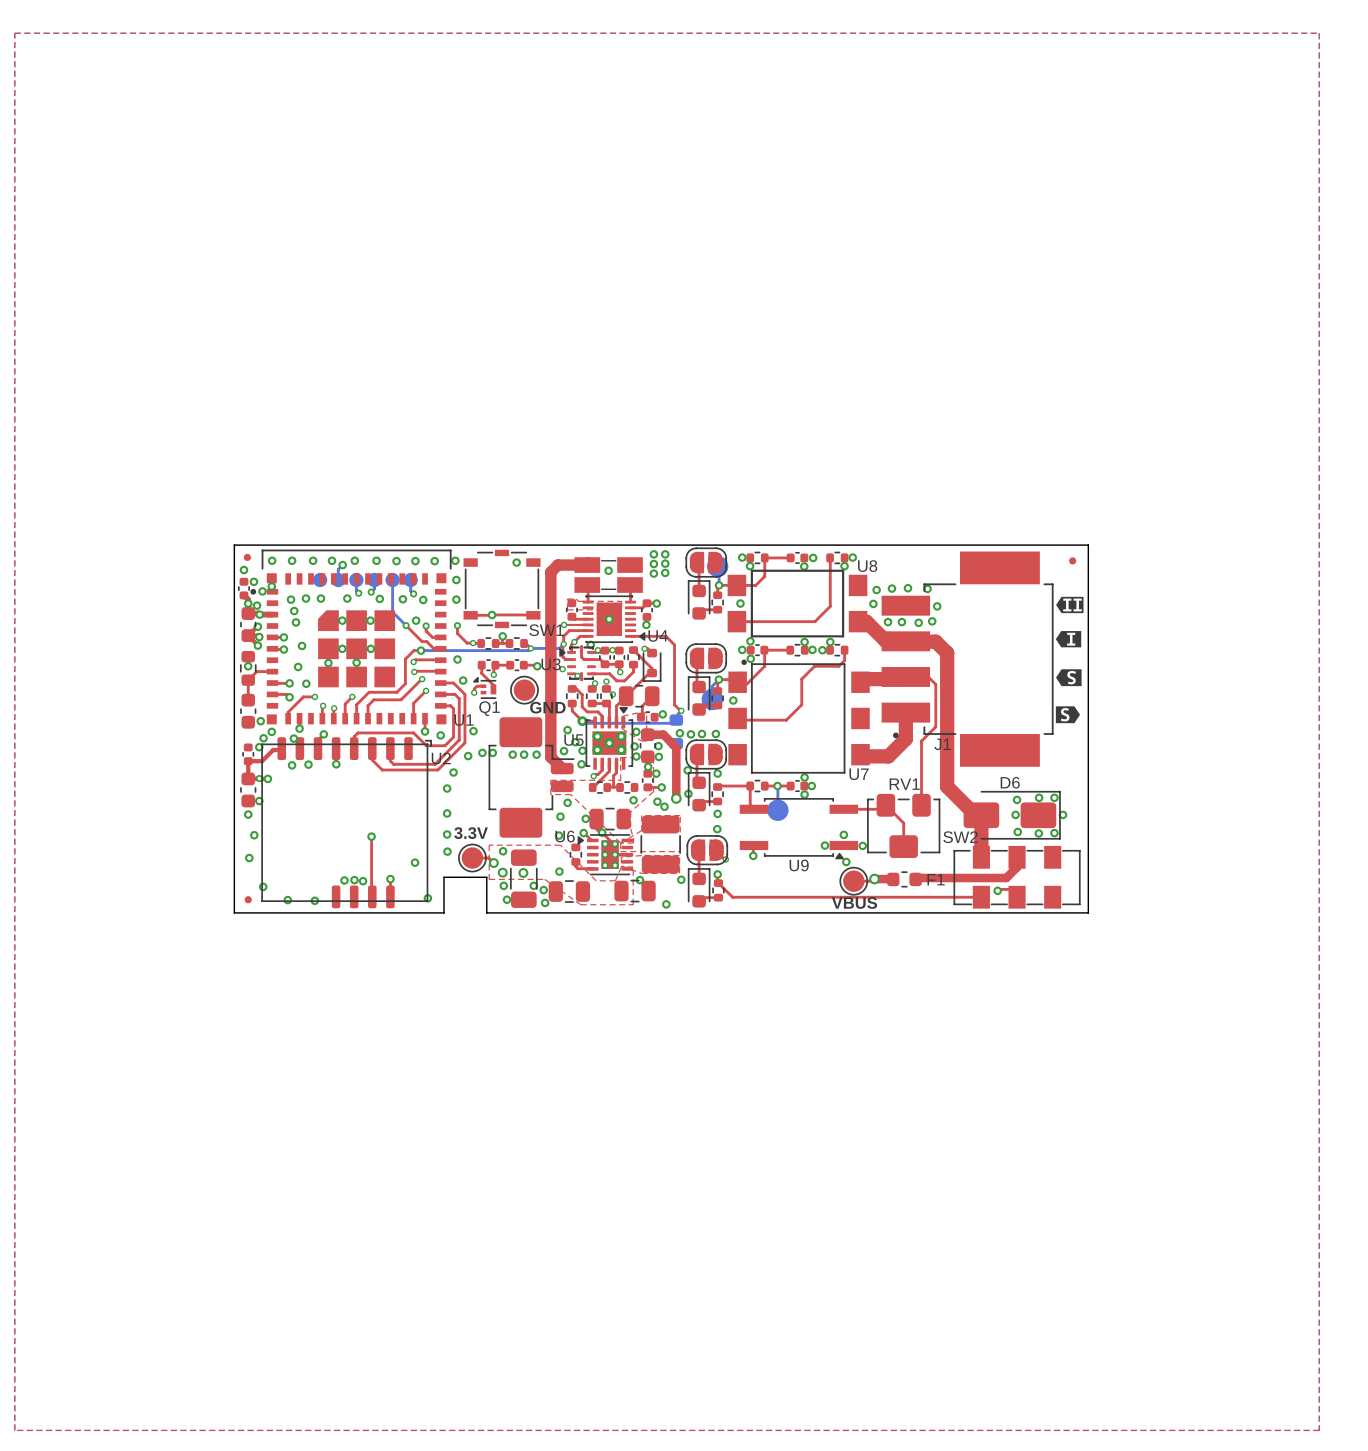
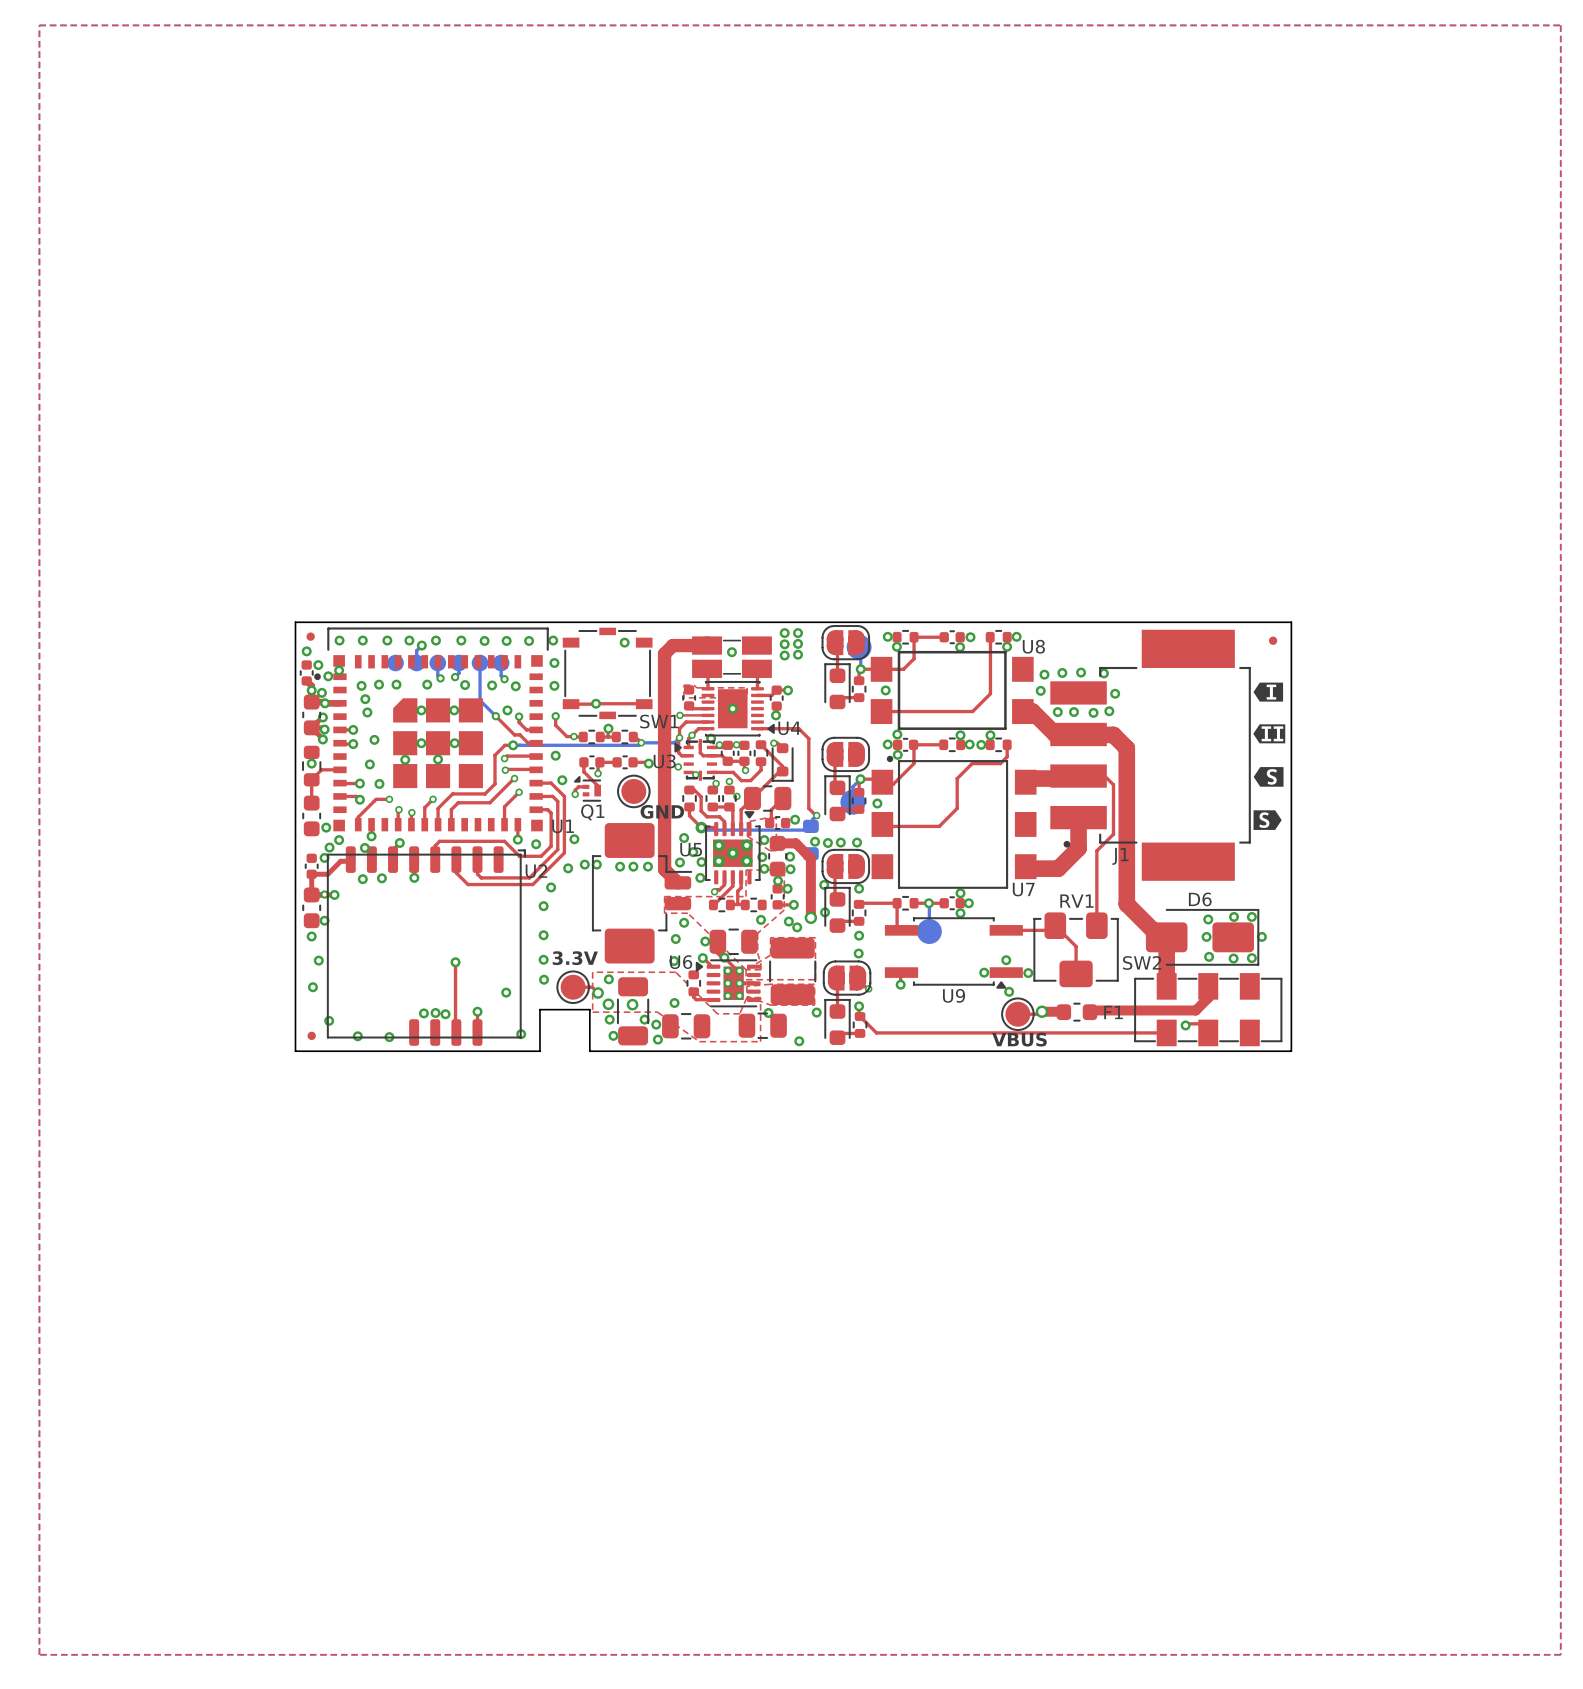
drawing position: (1069, 604) -> (1269, 733)
drawing position: (1068, 639) -> (1268, 692)

